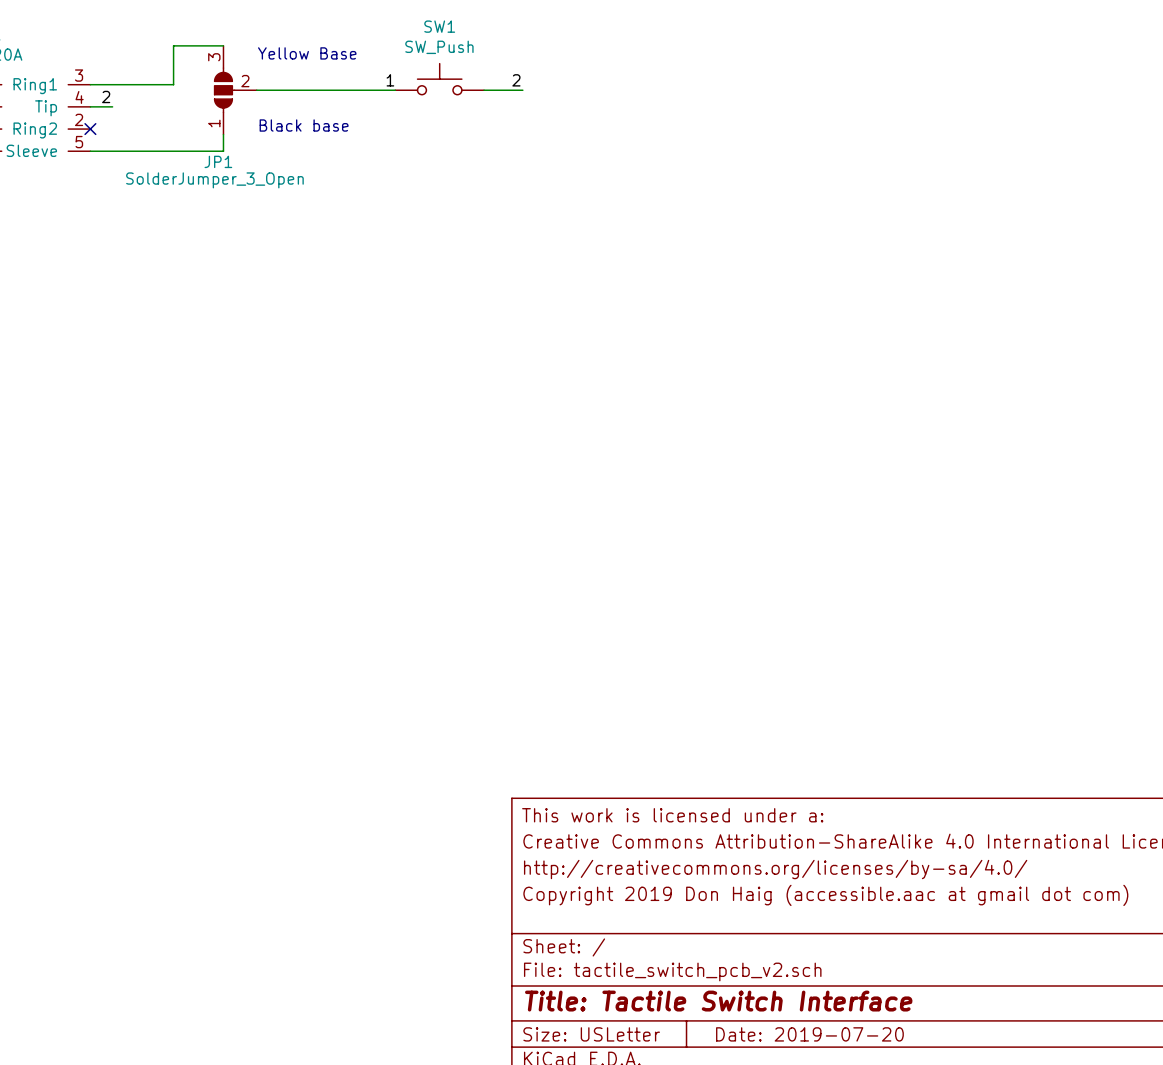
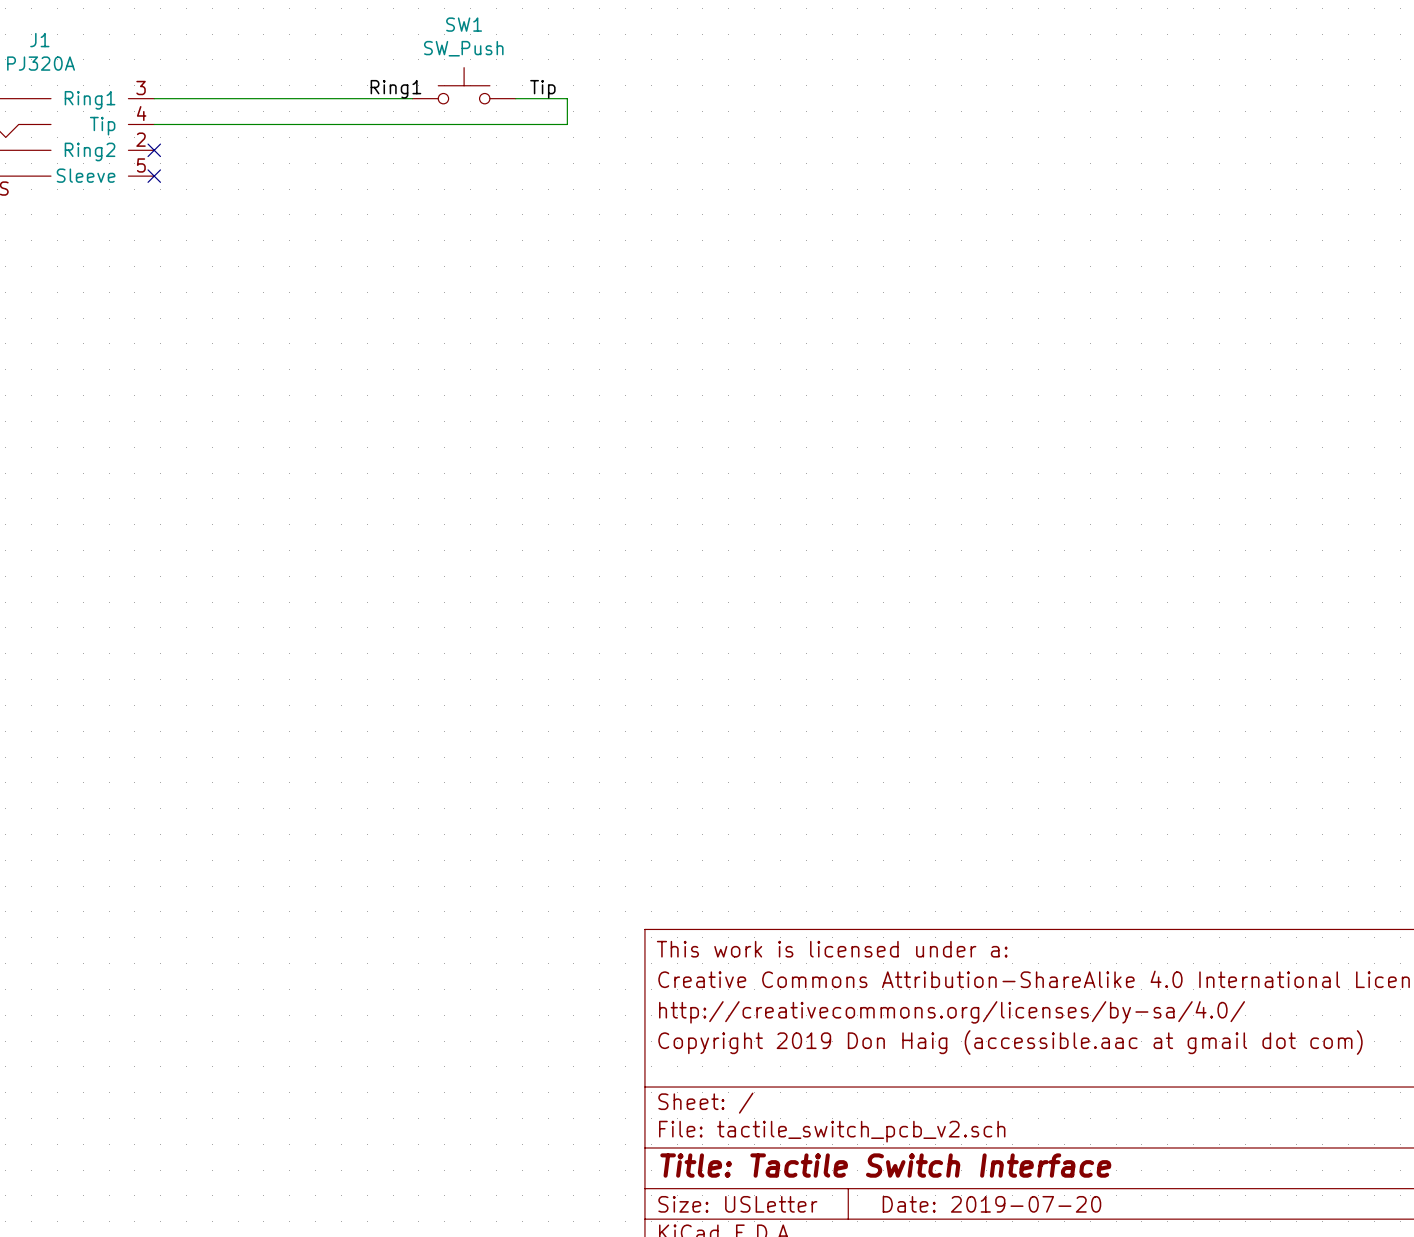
wire: (223, 45) (173, 45) (173, 84) -> (412, 98) (251, 98)
text: Yellow Base (307, 53) -> none
label: none -> Ring1 (395, 89)
label: none -> Tip (542, 89)
SW1 position: (439, 79) -> (464, 85)
label: 1 (390, 80) -> none
label: 2 (516, 80) -> none
wire: none -> (515, 98) (567, 98) (567, 124) (180, 124)
JP1: SolderJumper_3_Open (235, 90) -> none
wire: (256, 90) (395, 90) -> none
wire: (484, 90) (522, 90) -> none
label: 2 (106, 96) -> none
text: Black base (304, 125) -> none
wire: (223, 134) (223, 151) (90, 151) -> none
no-connect mark: none -> (154, 176)

